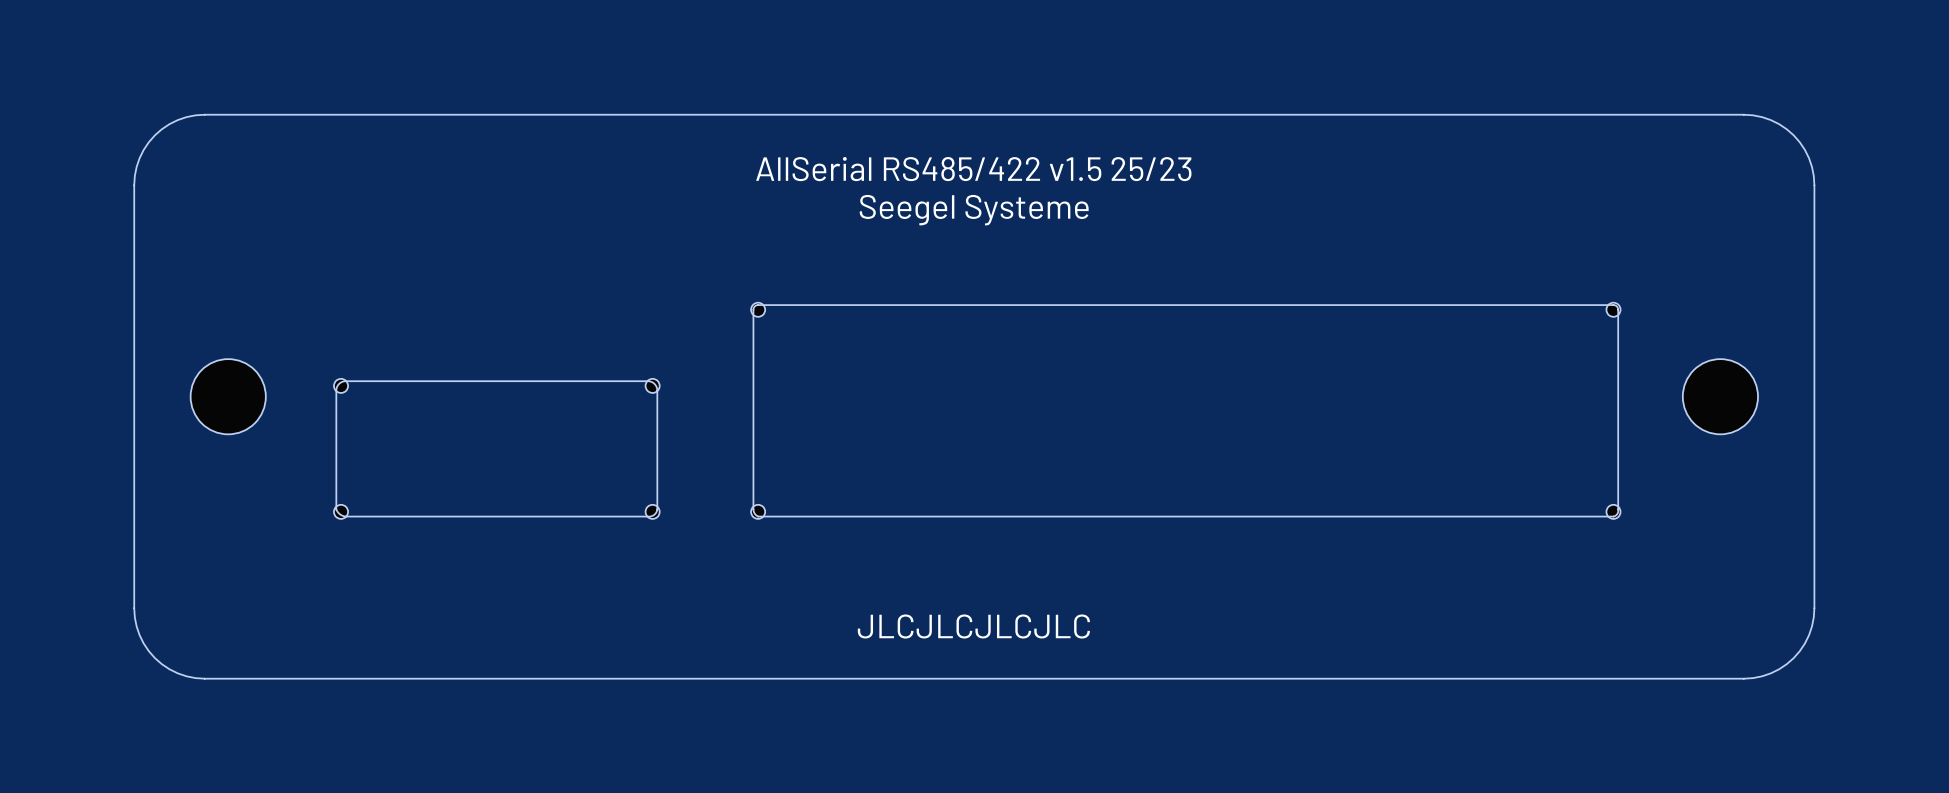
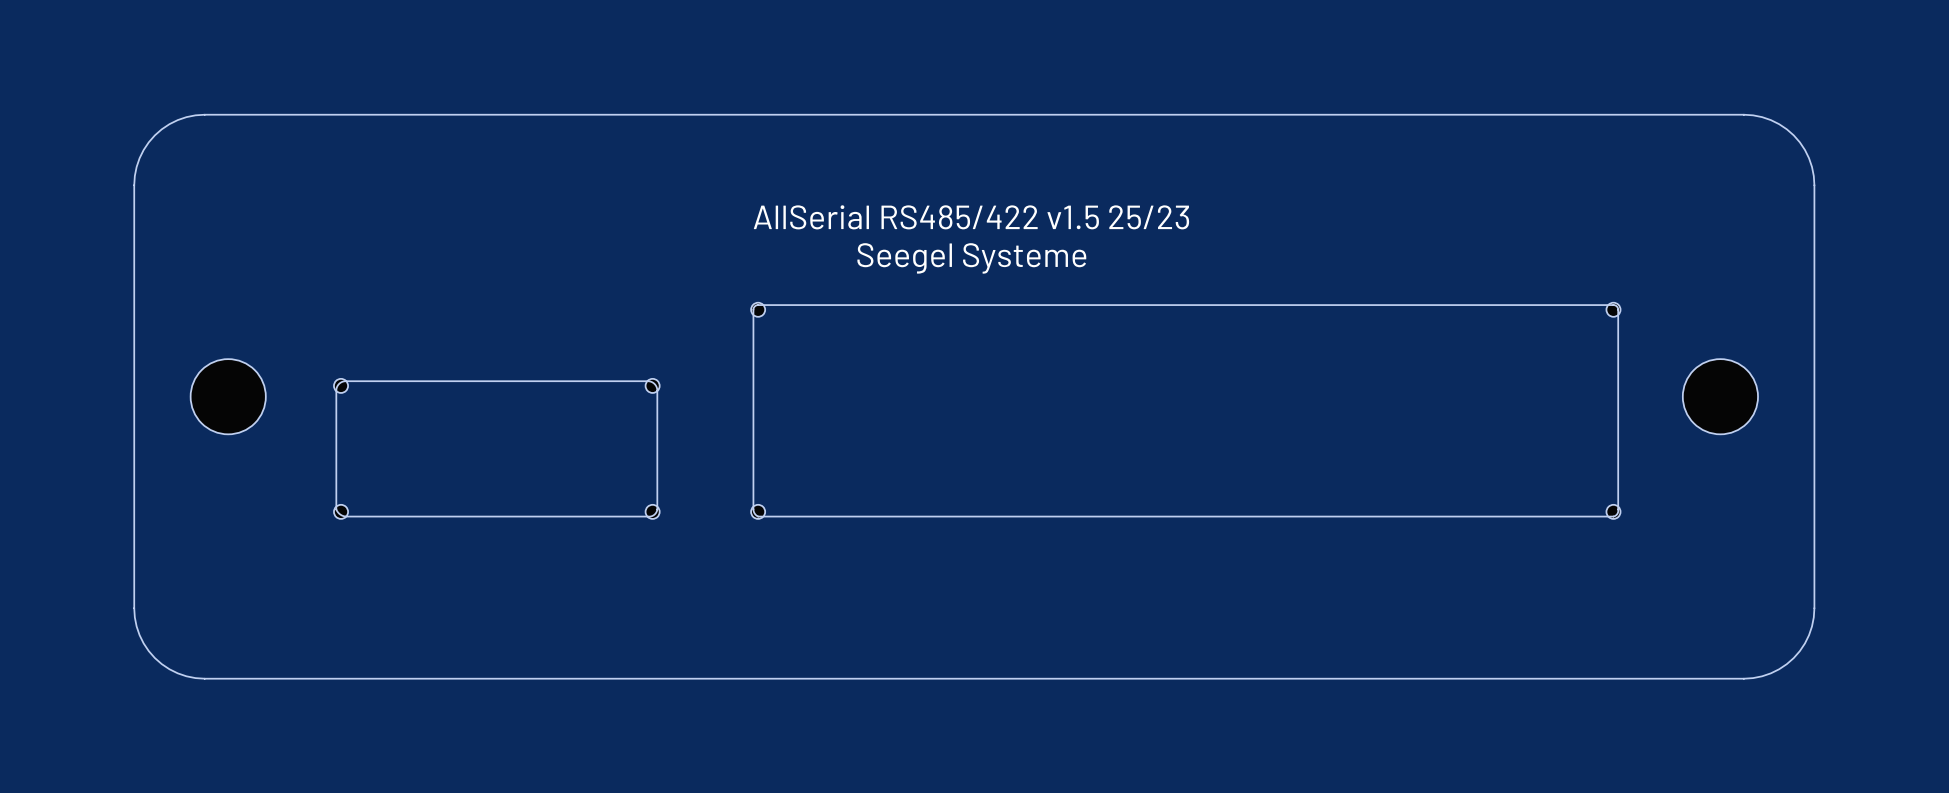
text position: AllSerial RS485/422 v1.5 25/23 (973, 169) -> AllSerial RS485/422 v1.5 25/23 (971, 217)
text position: Seegel Systeme (974, 210) -> Seegel Systeme (971, 258)
text: JLCJLCJLCJLC (973, 626) -> none

